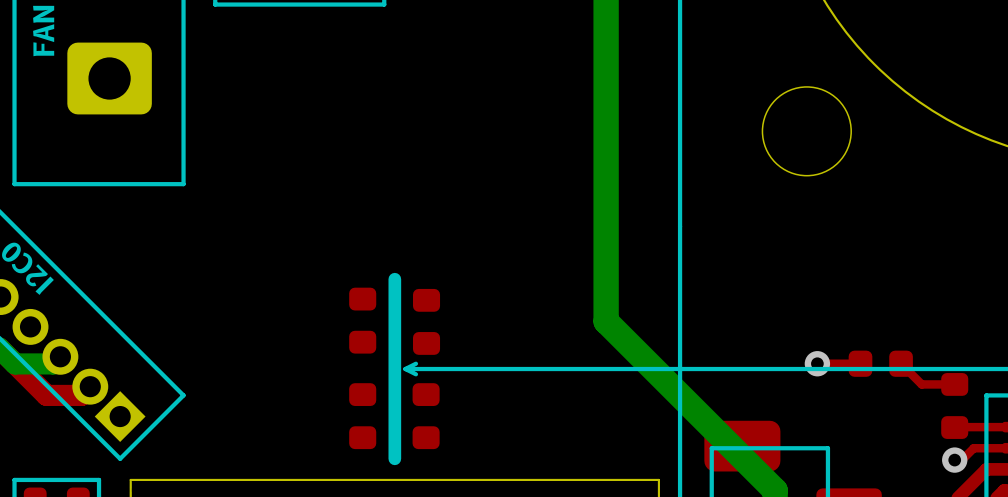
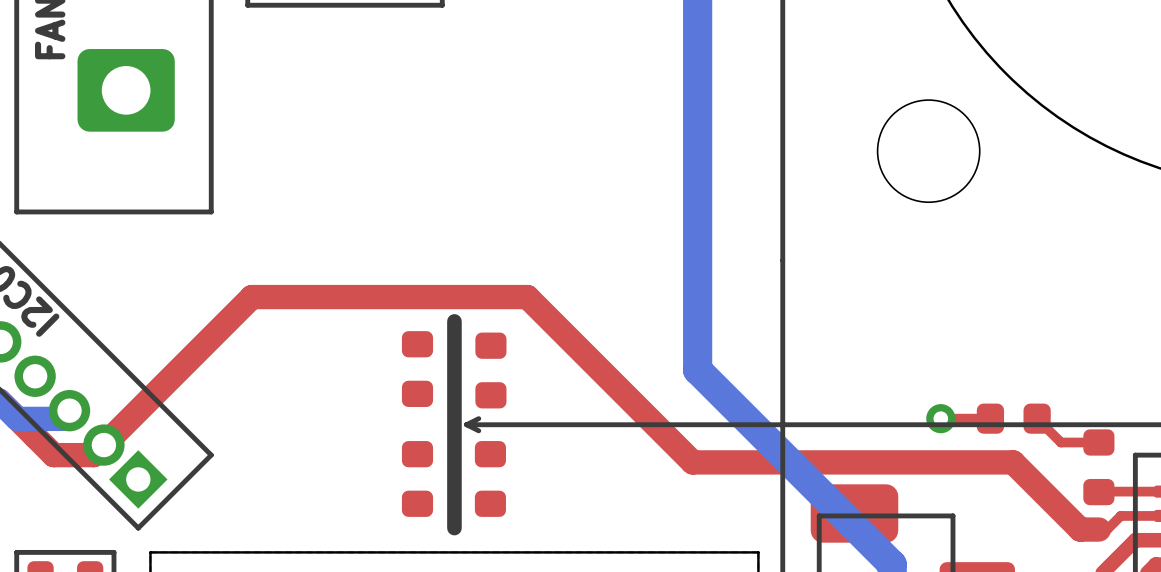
top track: none -> (103, 445) (251, 297) (527, 297) (692, 462) (1013, 462) (1080, 529) (1098, 529)
via: (954, 460) -> none

